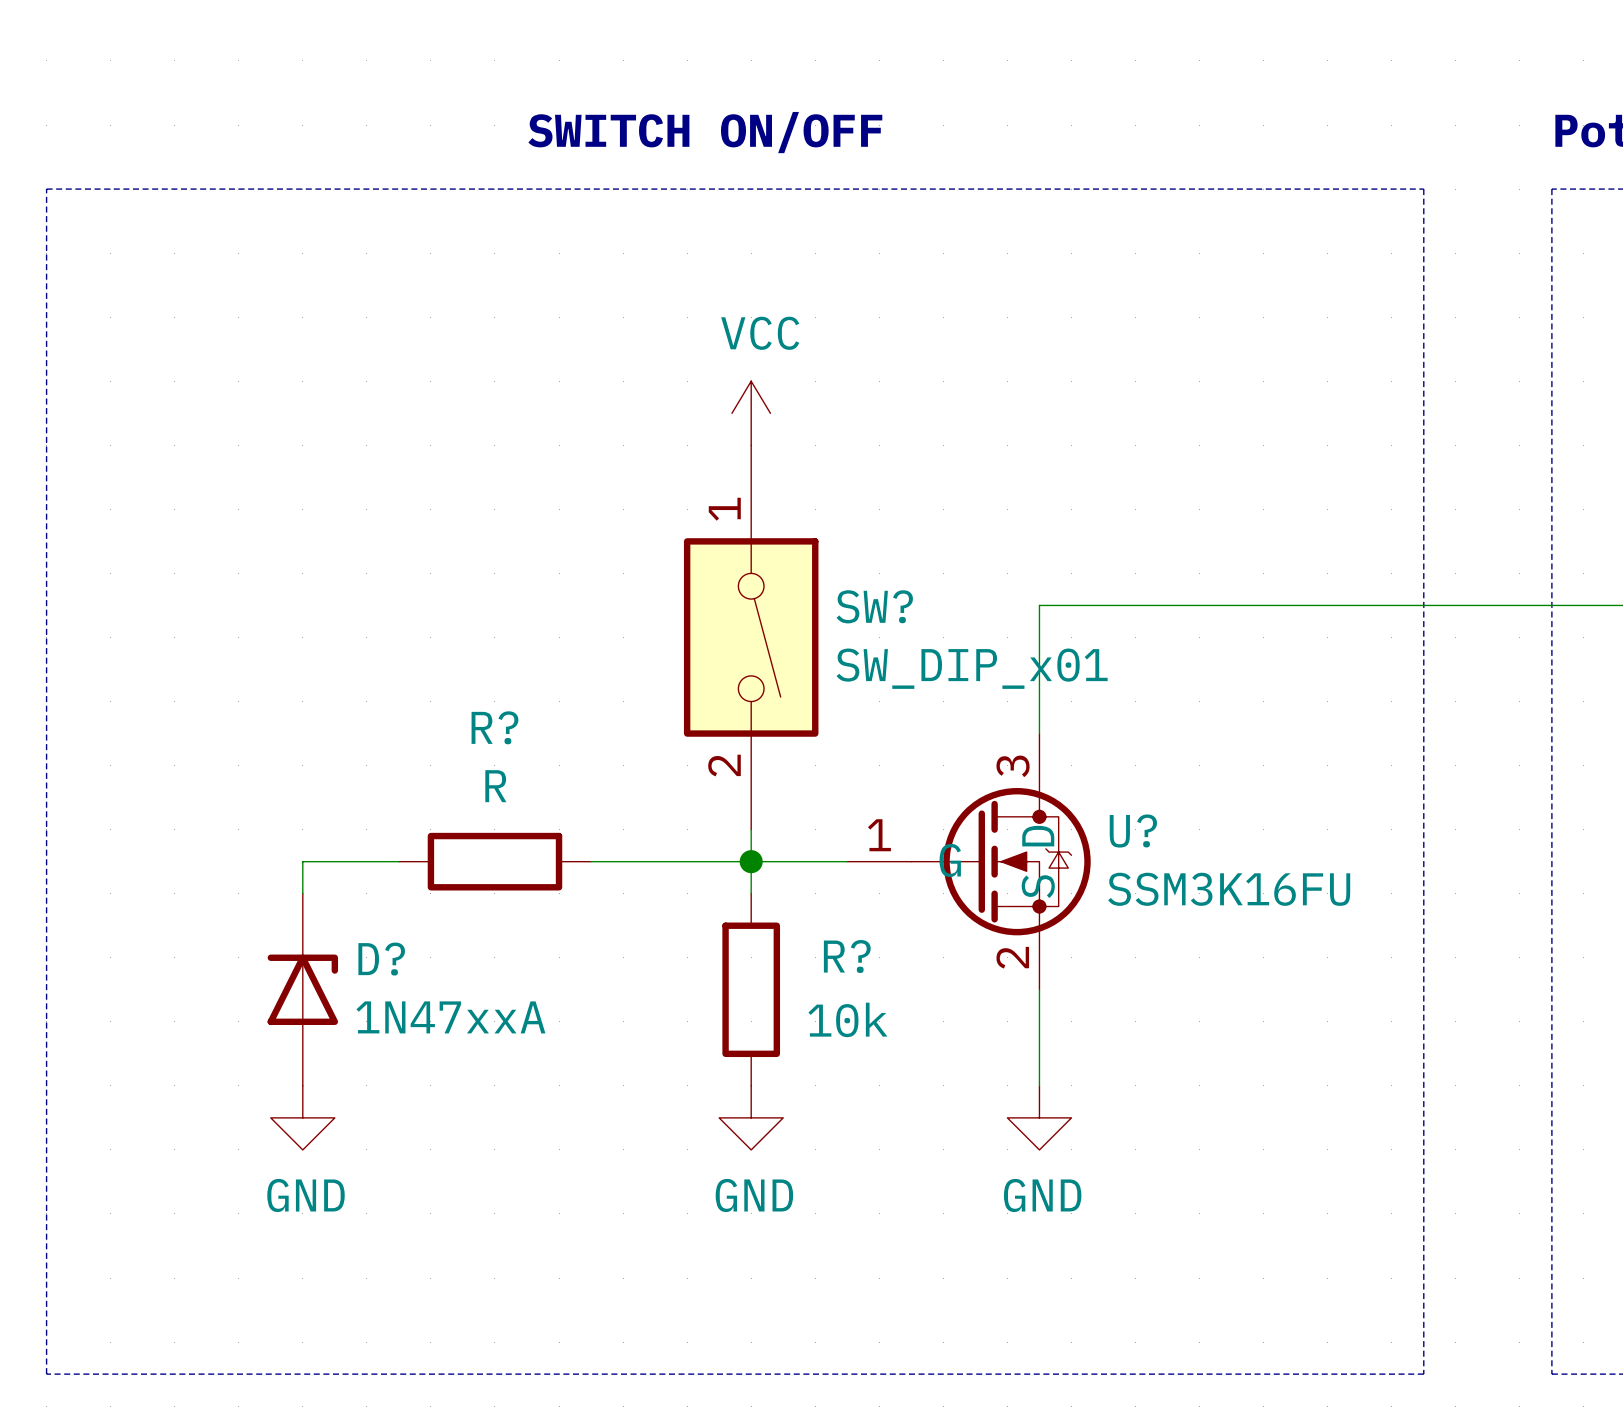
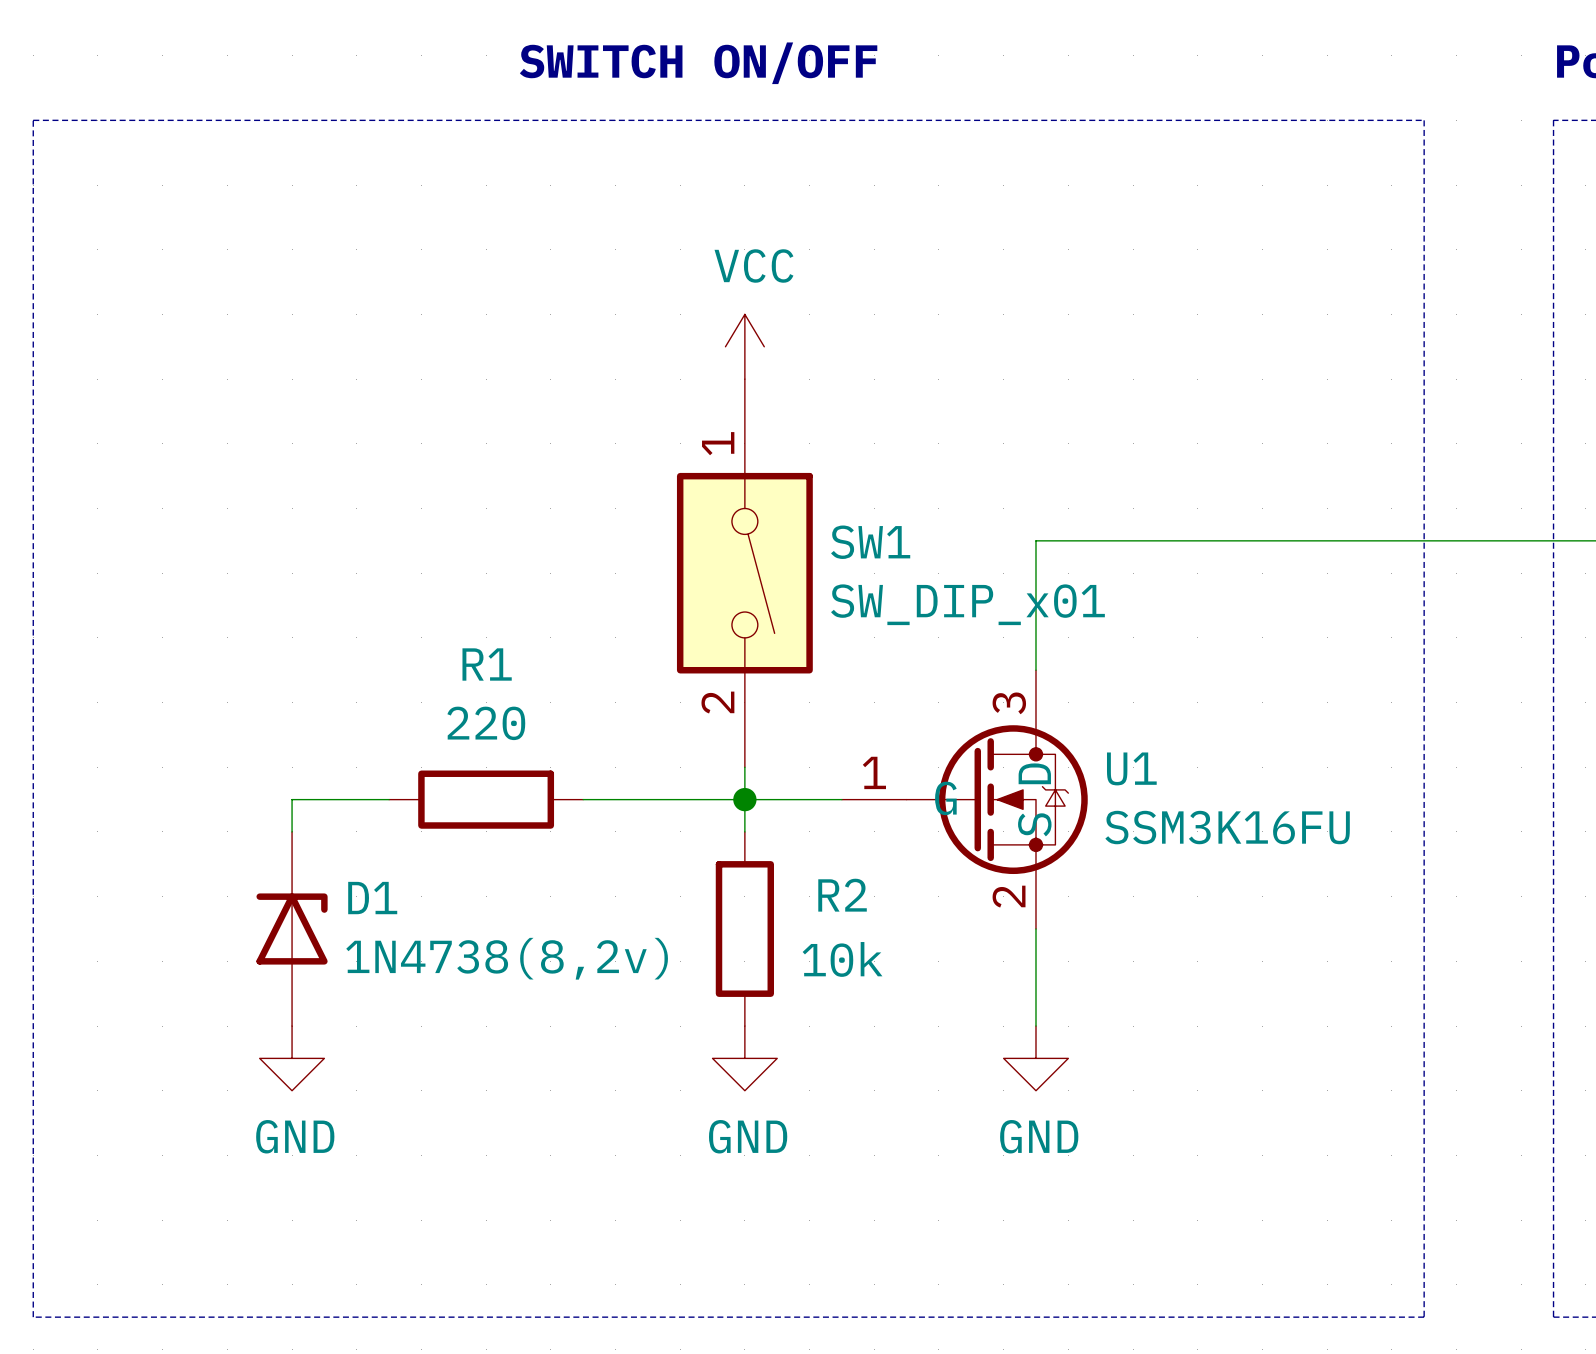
SW? name: SW? (874, 606) -> SW1 (870, 542)
R? name: R? (494, 727) -> R1 (487, 664)
R? value: R (495, 786) -> 220 (486, 723)
U? name: U? (1133, 831) -> U1 (1131, 768)
R? name: R? (847, 956) -> R2 (842, 895)
D? name: D? (381, 959) -> D1 (372, 898)
D? value: 1N47xxA (450, 1017) -> 1N4738(8,2v) (507, 958)

